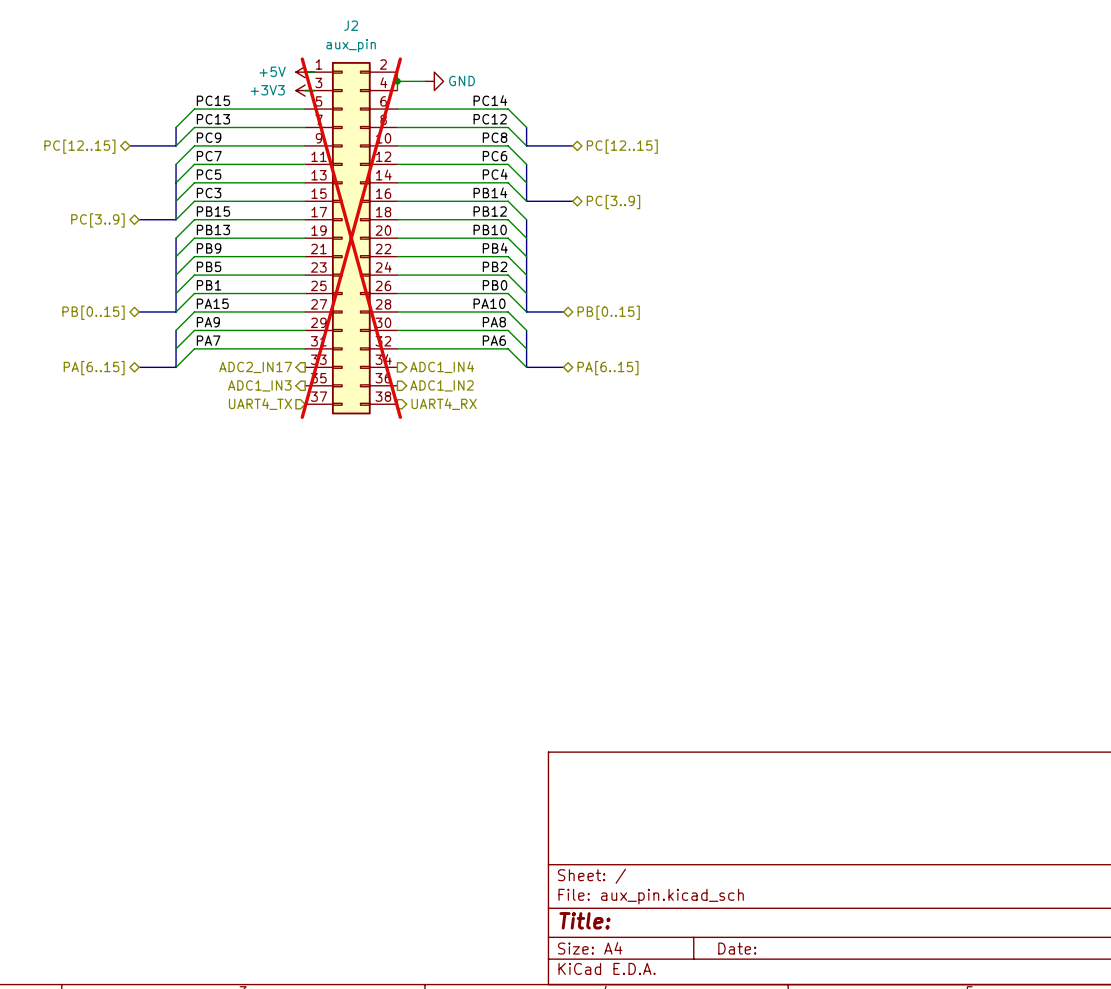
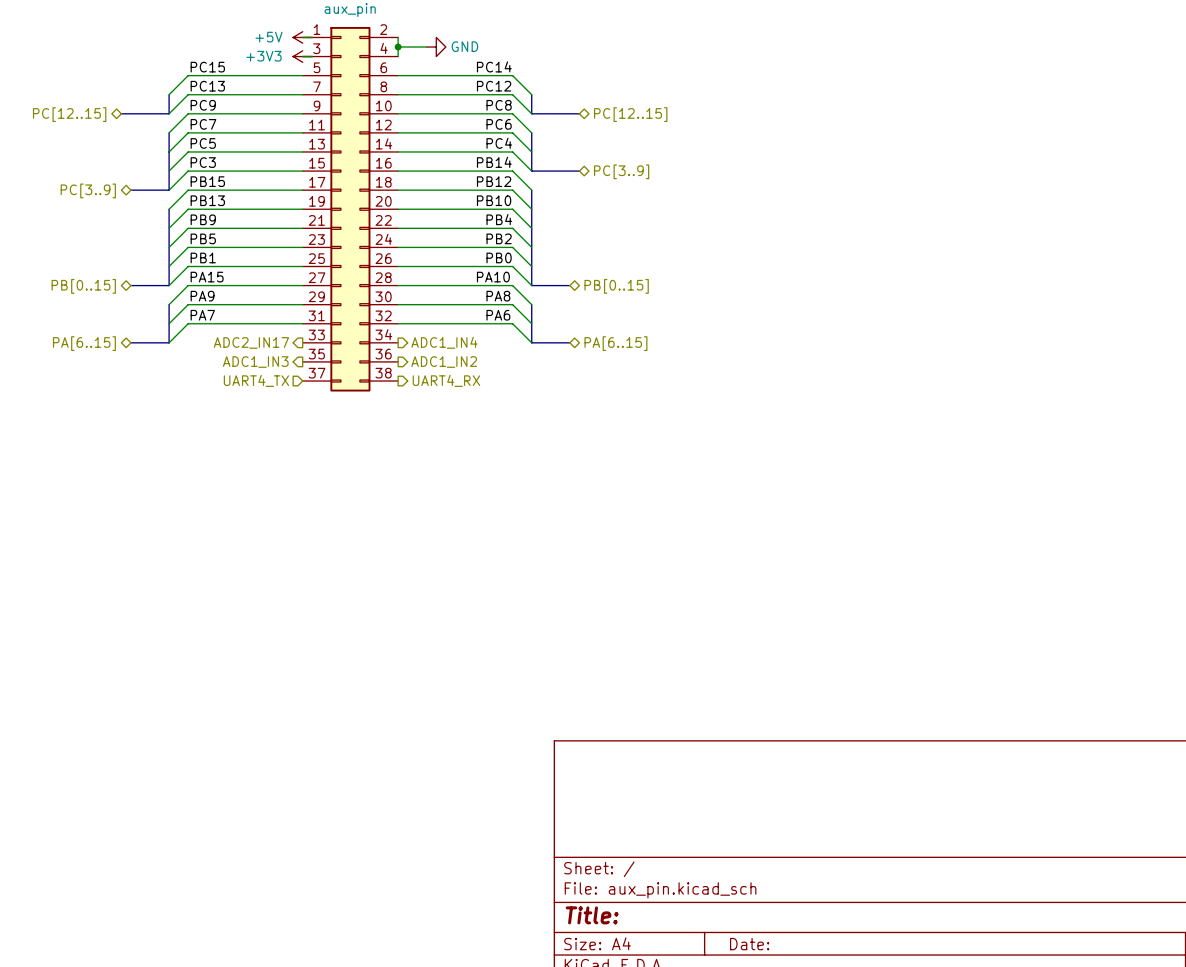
J2 do-not-place cross: (351, 238) -> none

